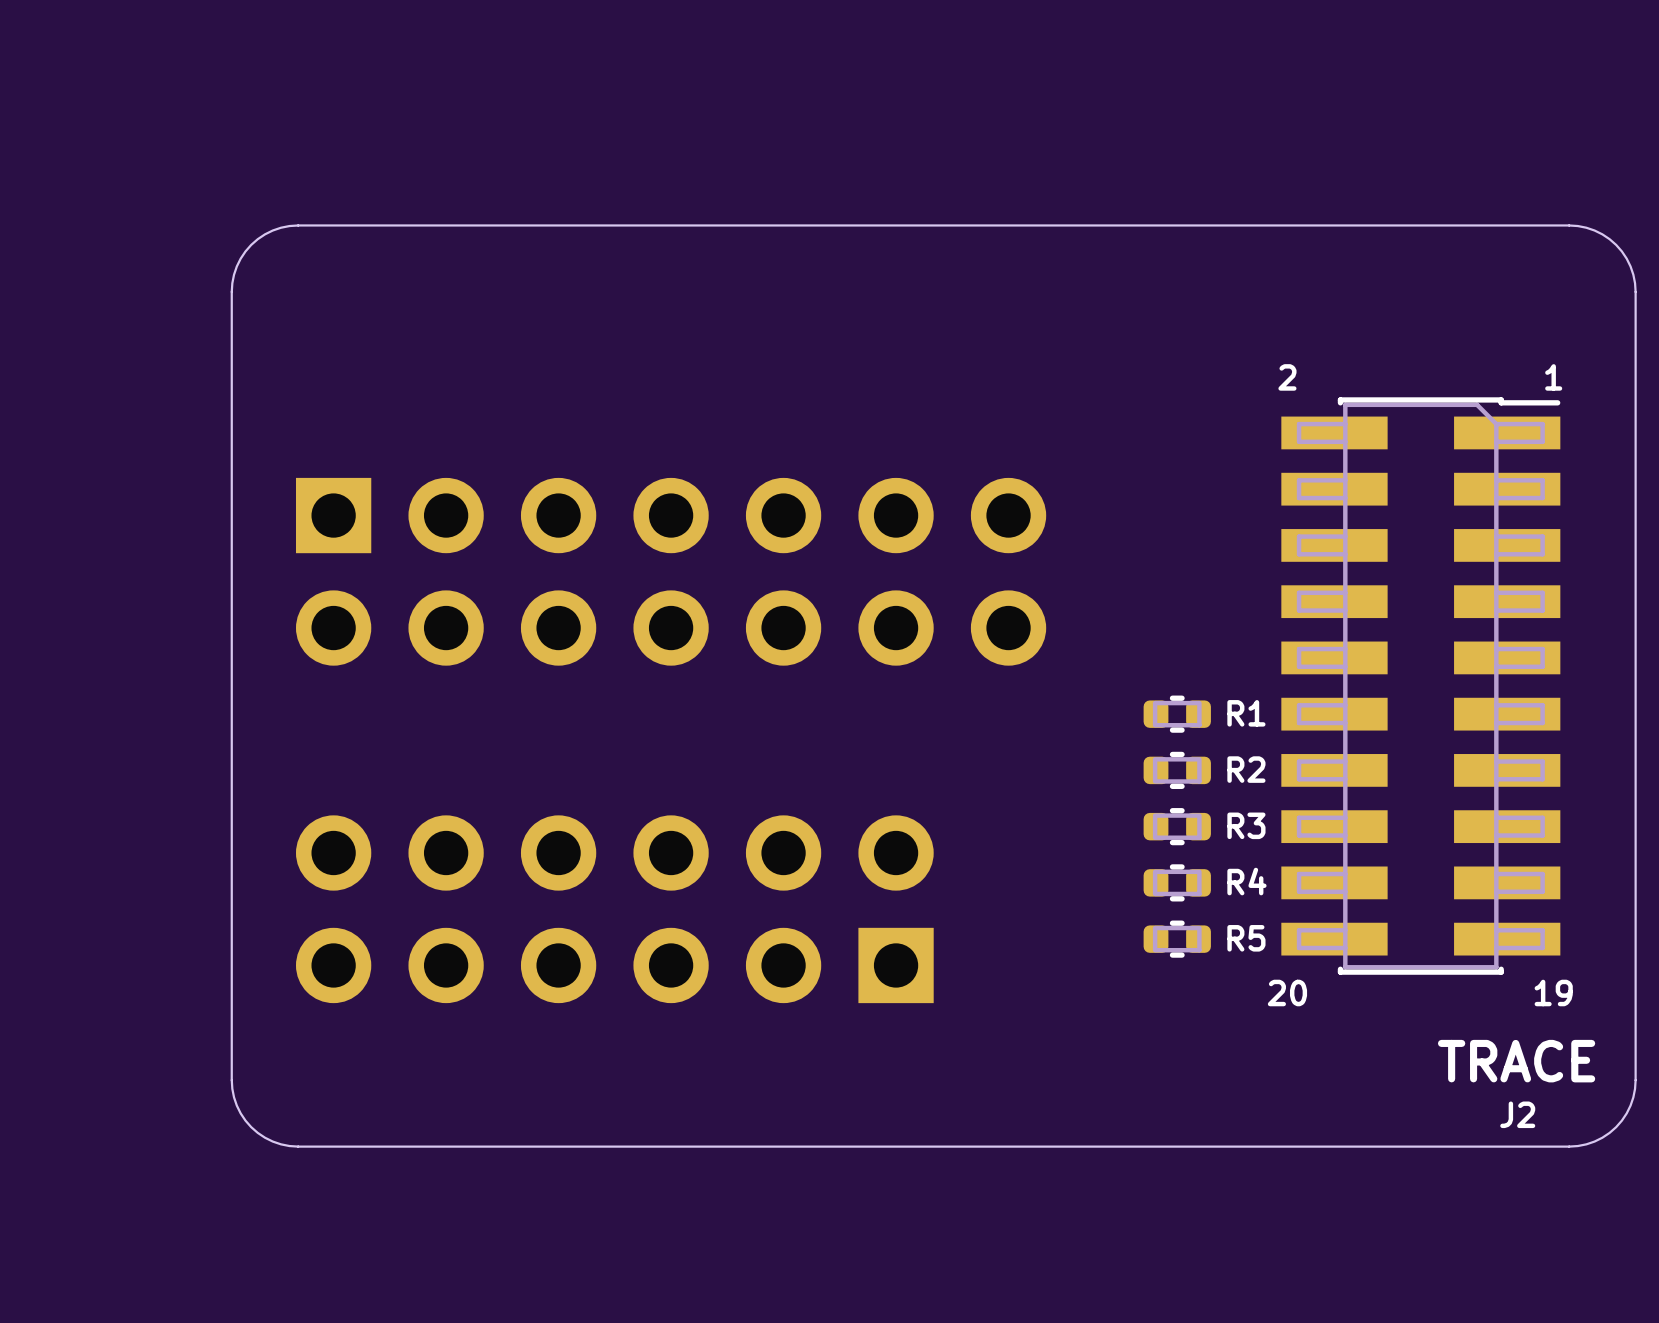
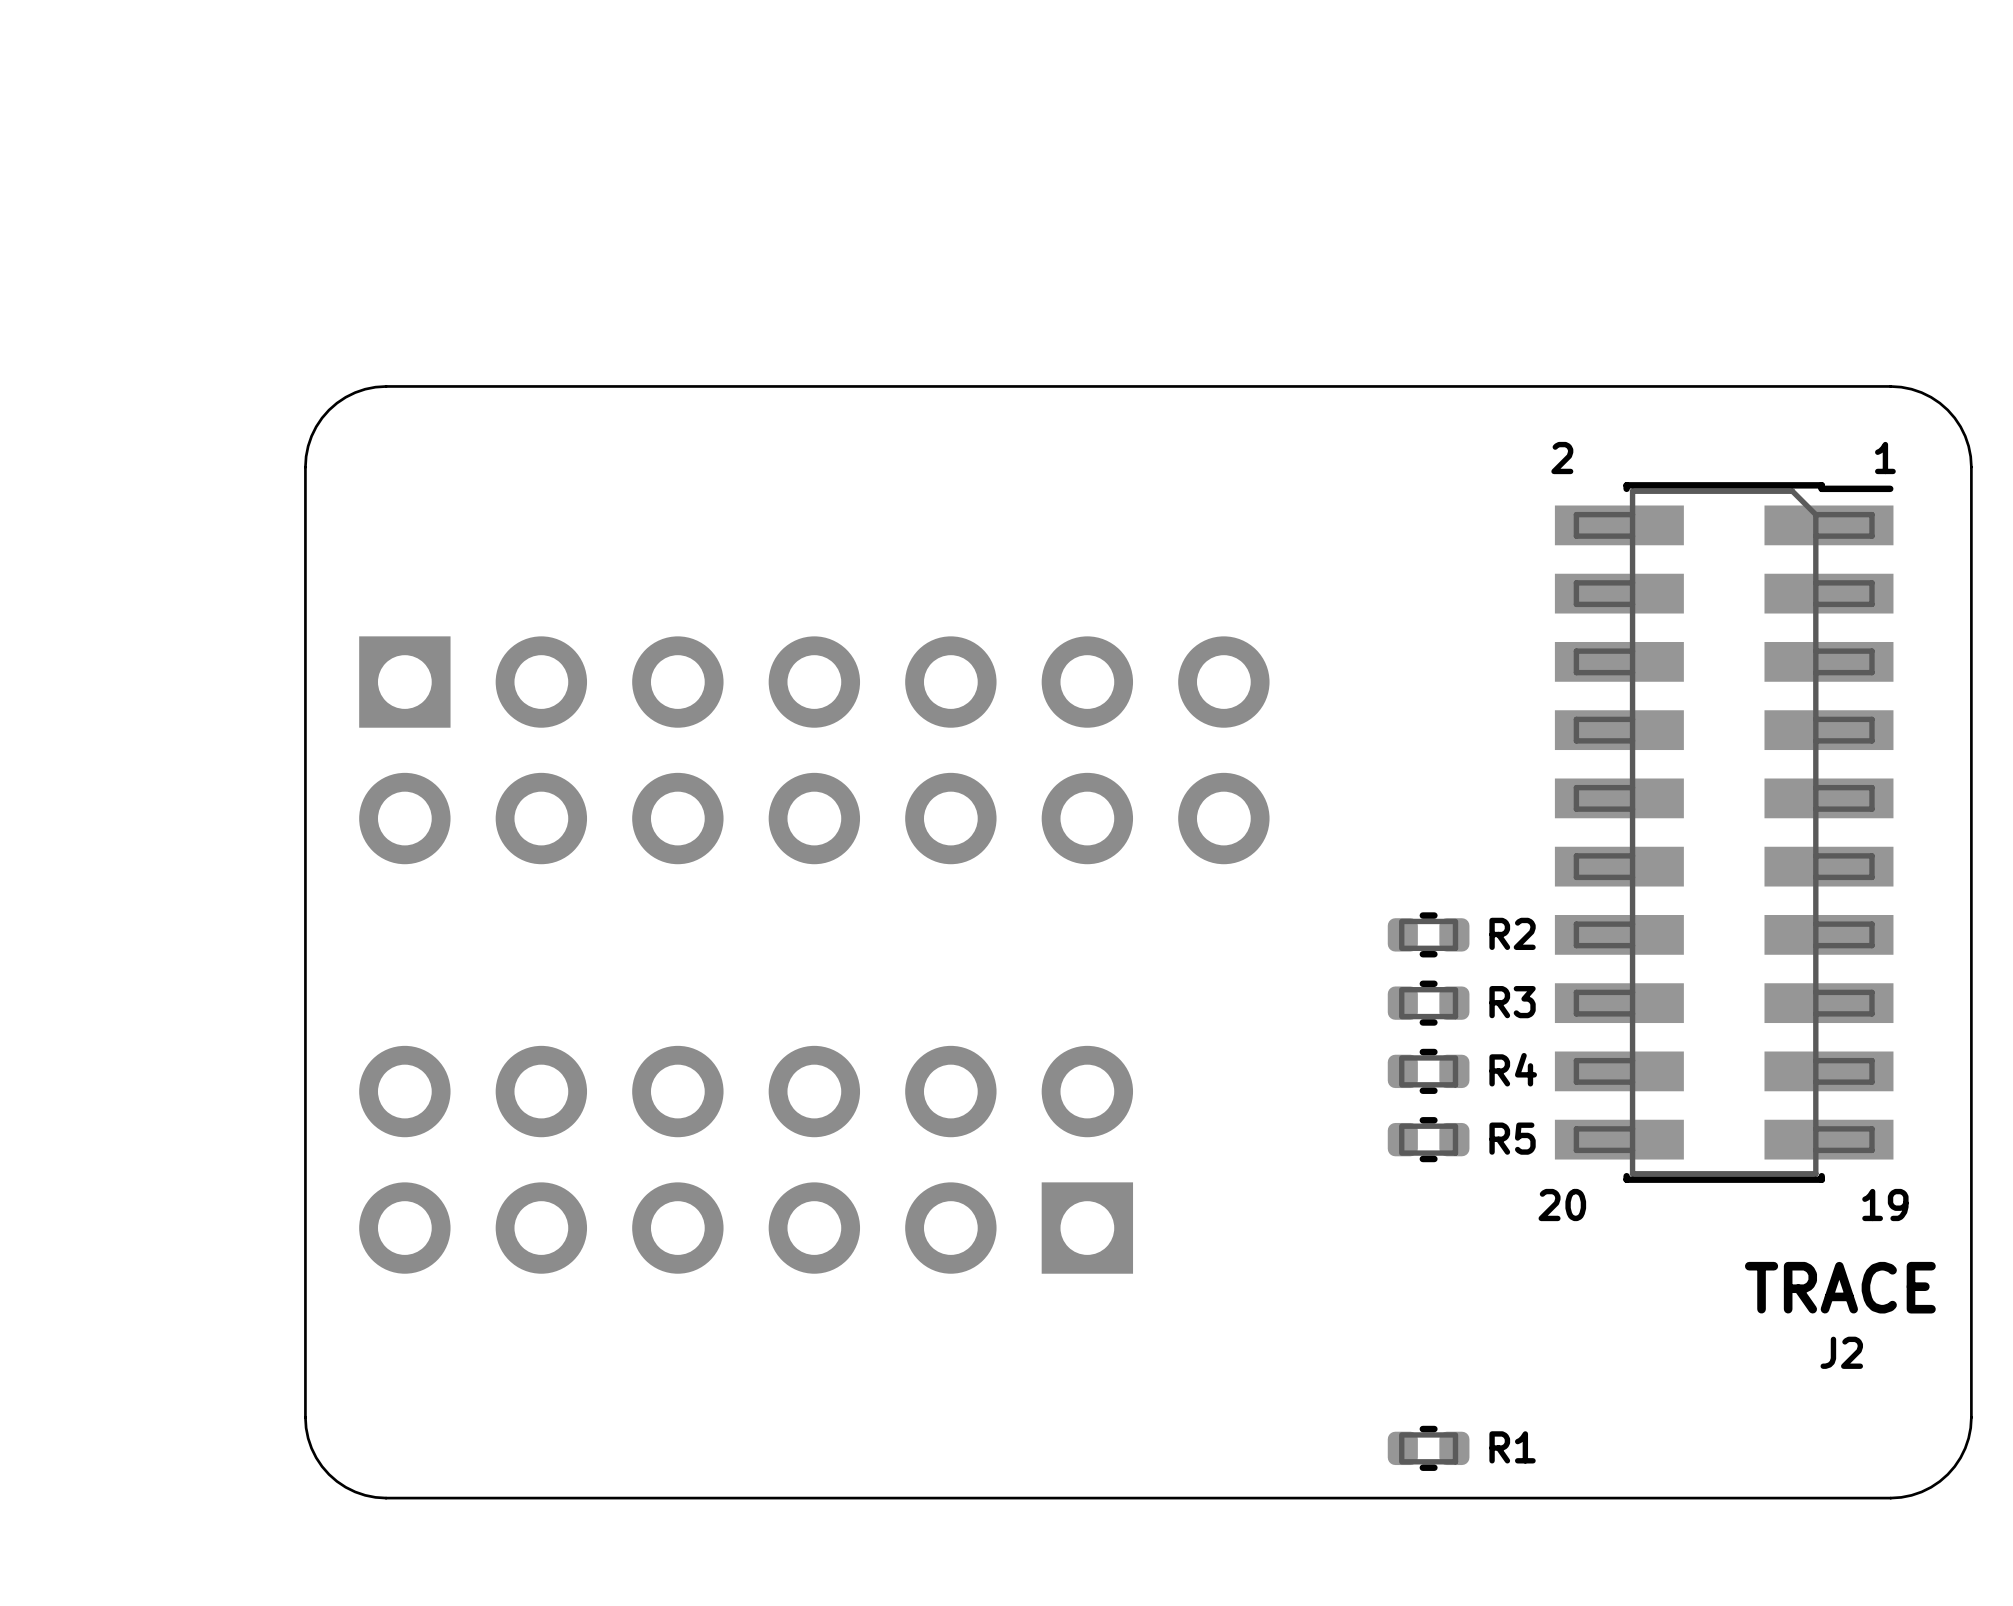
board edge: (1569, 225) (298, 225) (272, 230) (257, 239) (245, 251) (236, 266) (231, 291) (231, 1080) (236, 1105) (245, 1120) (257, 1132) (272, 1141) (298, 1146) (1569, 1146) (1594, 1141) (1609, 1132) (1621, 1120) (1630, 1105) (1635, 1080) (1635, 291) (1630, 266) (1616, 244) (1594, 230) (1569, 225) -> (1890, 386) (1921, 392) (1947, 410) (1965, 436) (1971, 467) (1971, 1417) (1965, 1448) (1954, 1466) (1939, 1481) (1921, 1491) (1890, 1498) (386, 1498) (355, 1491) (336, 1481) (322, 1466) (308, 1438) (305, 1417) (305, 467) (308, 446) (316, 426) (336, 403) (355, 392) (386, 386) (1890, 386)
part position: (671, 571) -> (814, 750)
R1 position: (1177, 714) -> (1428, 1448)
part position: (614, 909) -> (746, 1159)

